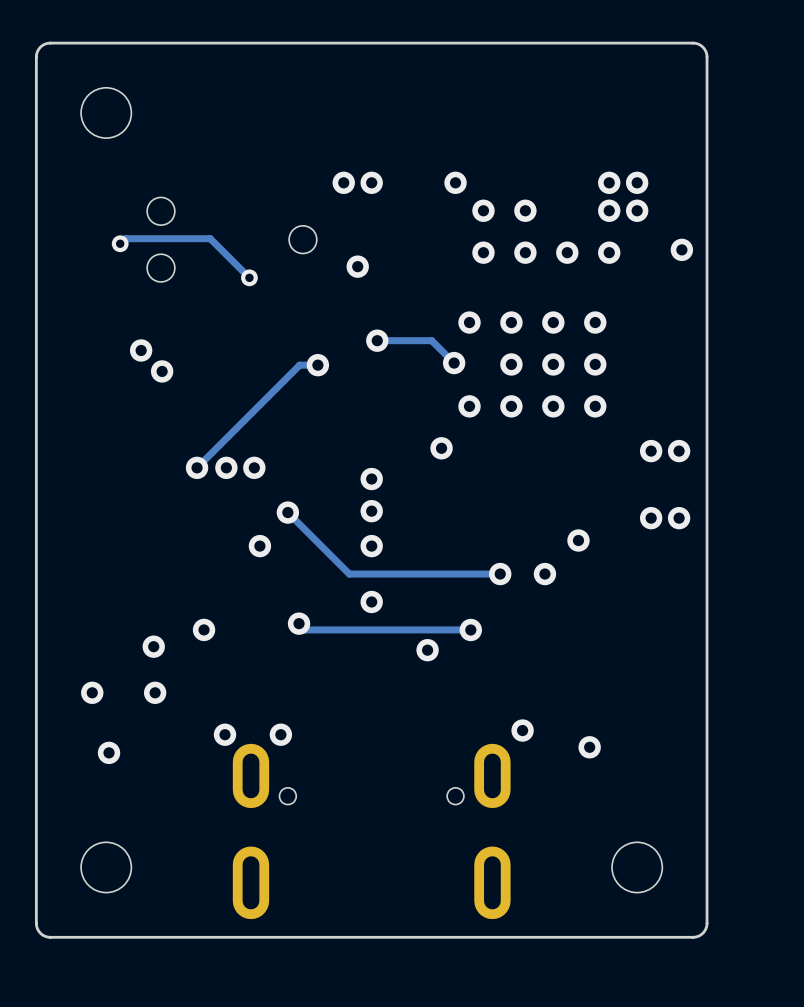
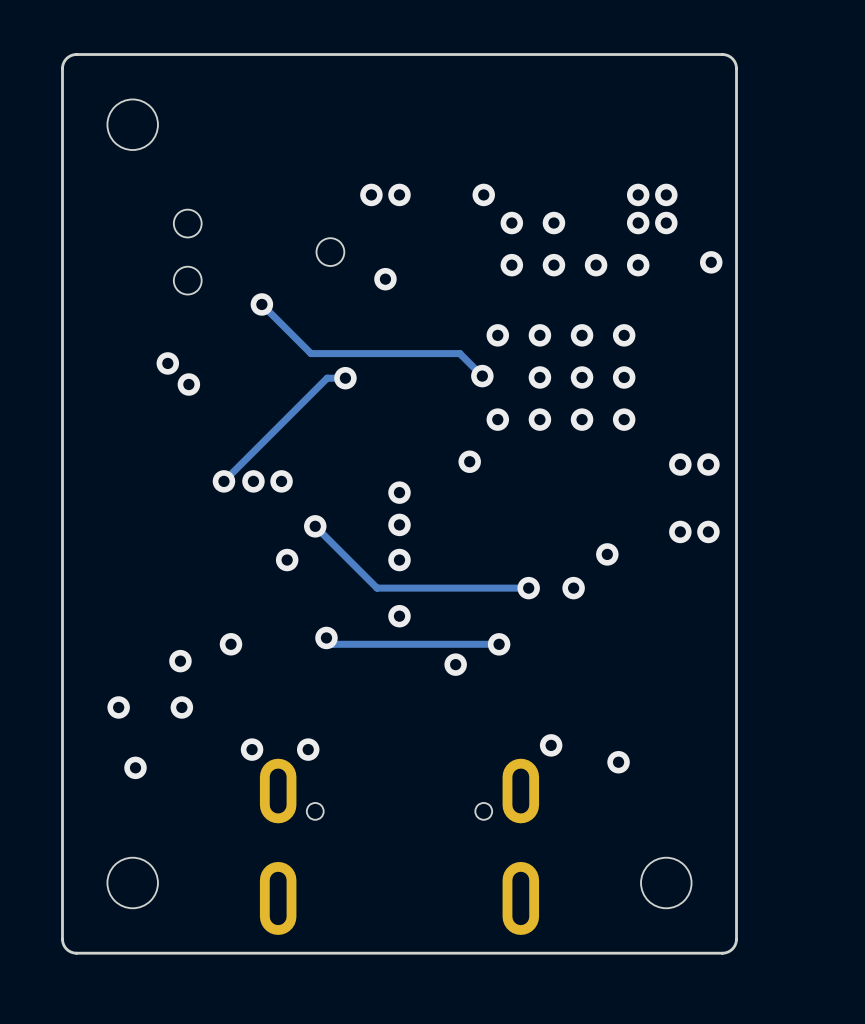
track: (120, 243) (125, 238) (210, 238) (249, 277) -> none
via: (120, 243) -> none
via: (249, 277) -> none
track: none -> (261, 304) (311, 353) (405, 353)
via position: (377, 340) -> (261, 304)

